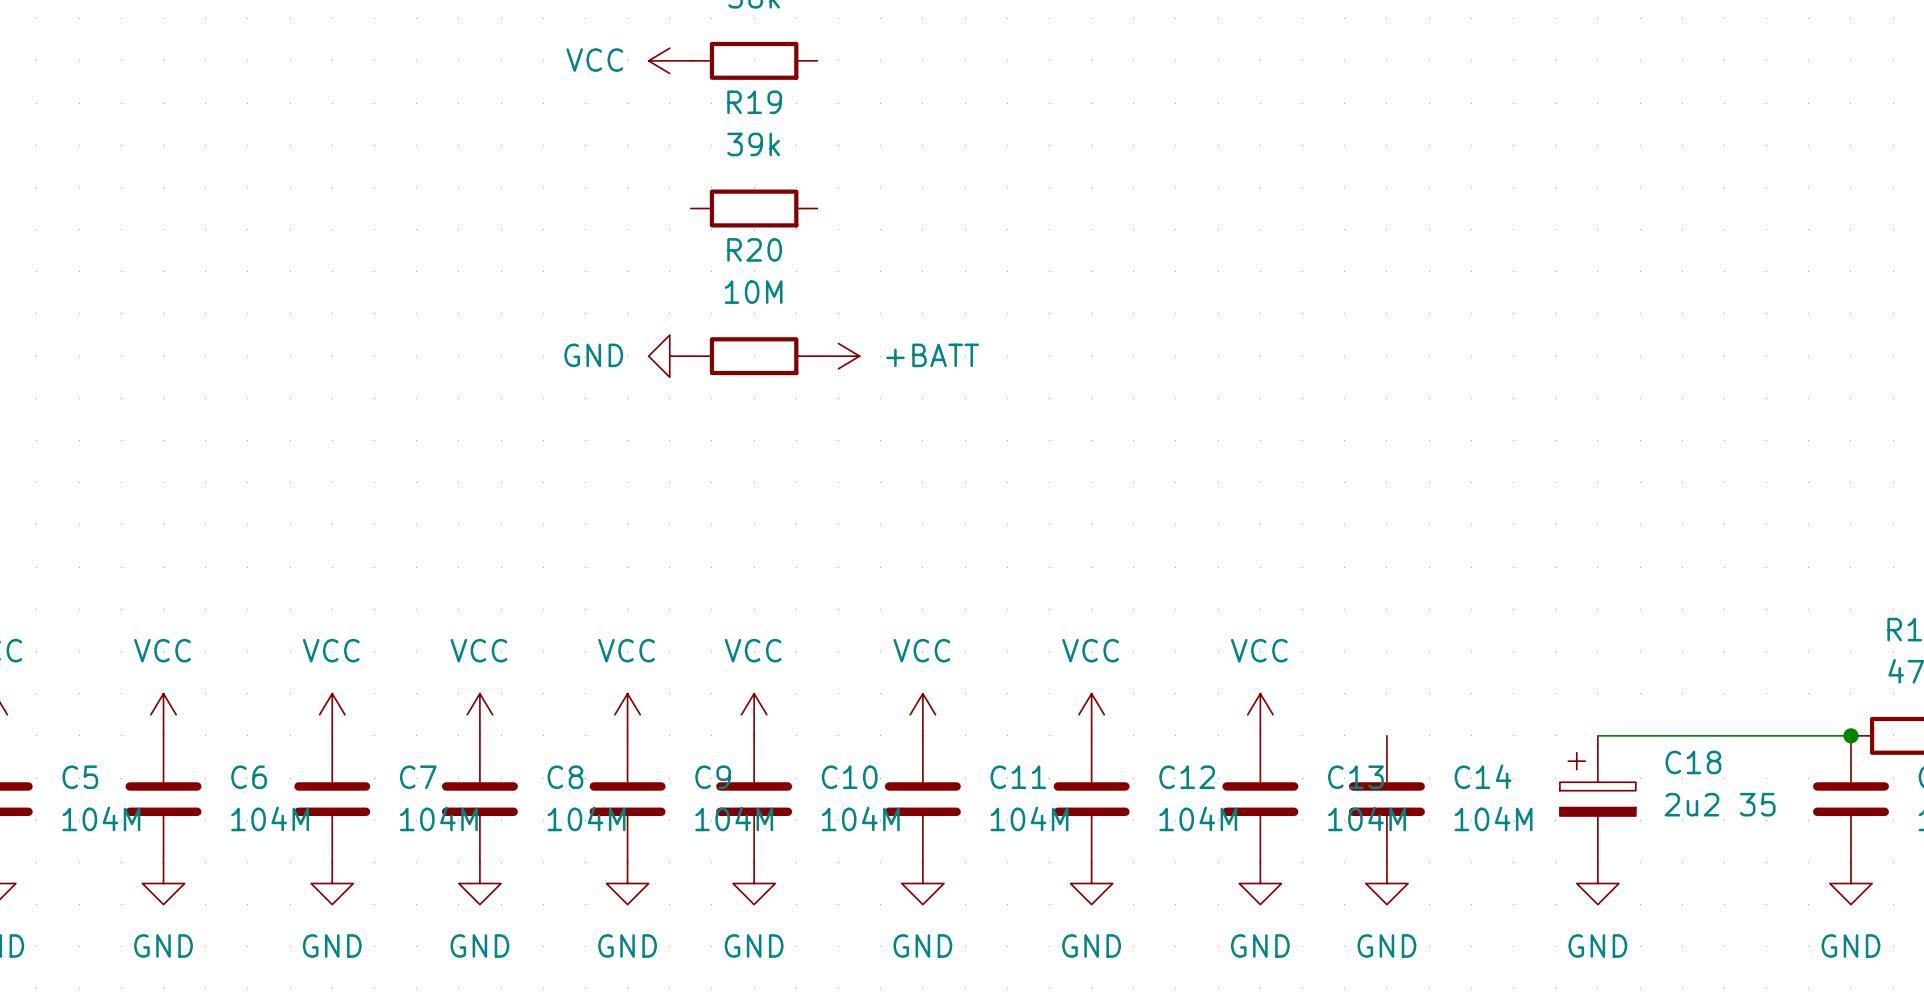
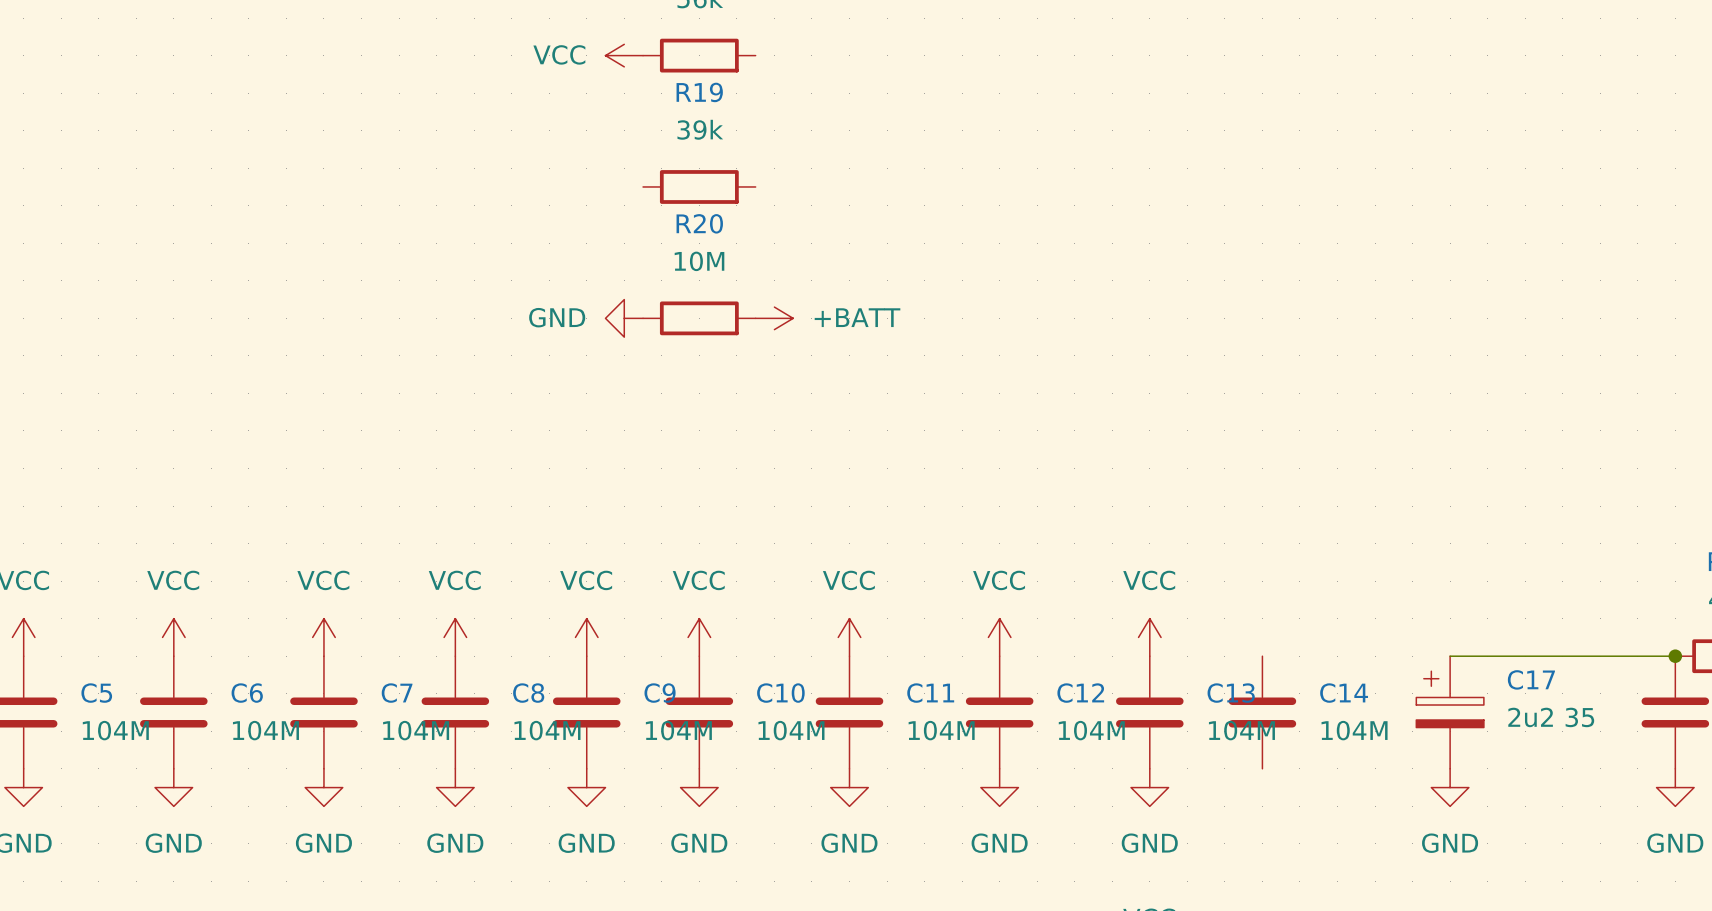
C18 name: C18 (1693, 762) -> C17 (1531, 679)
power symbol: GND (1386, 883) -> none

